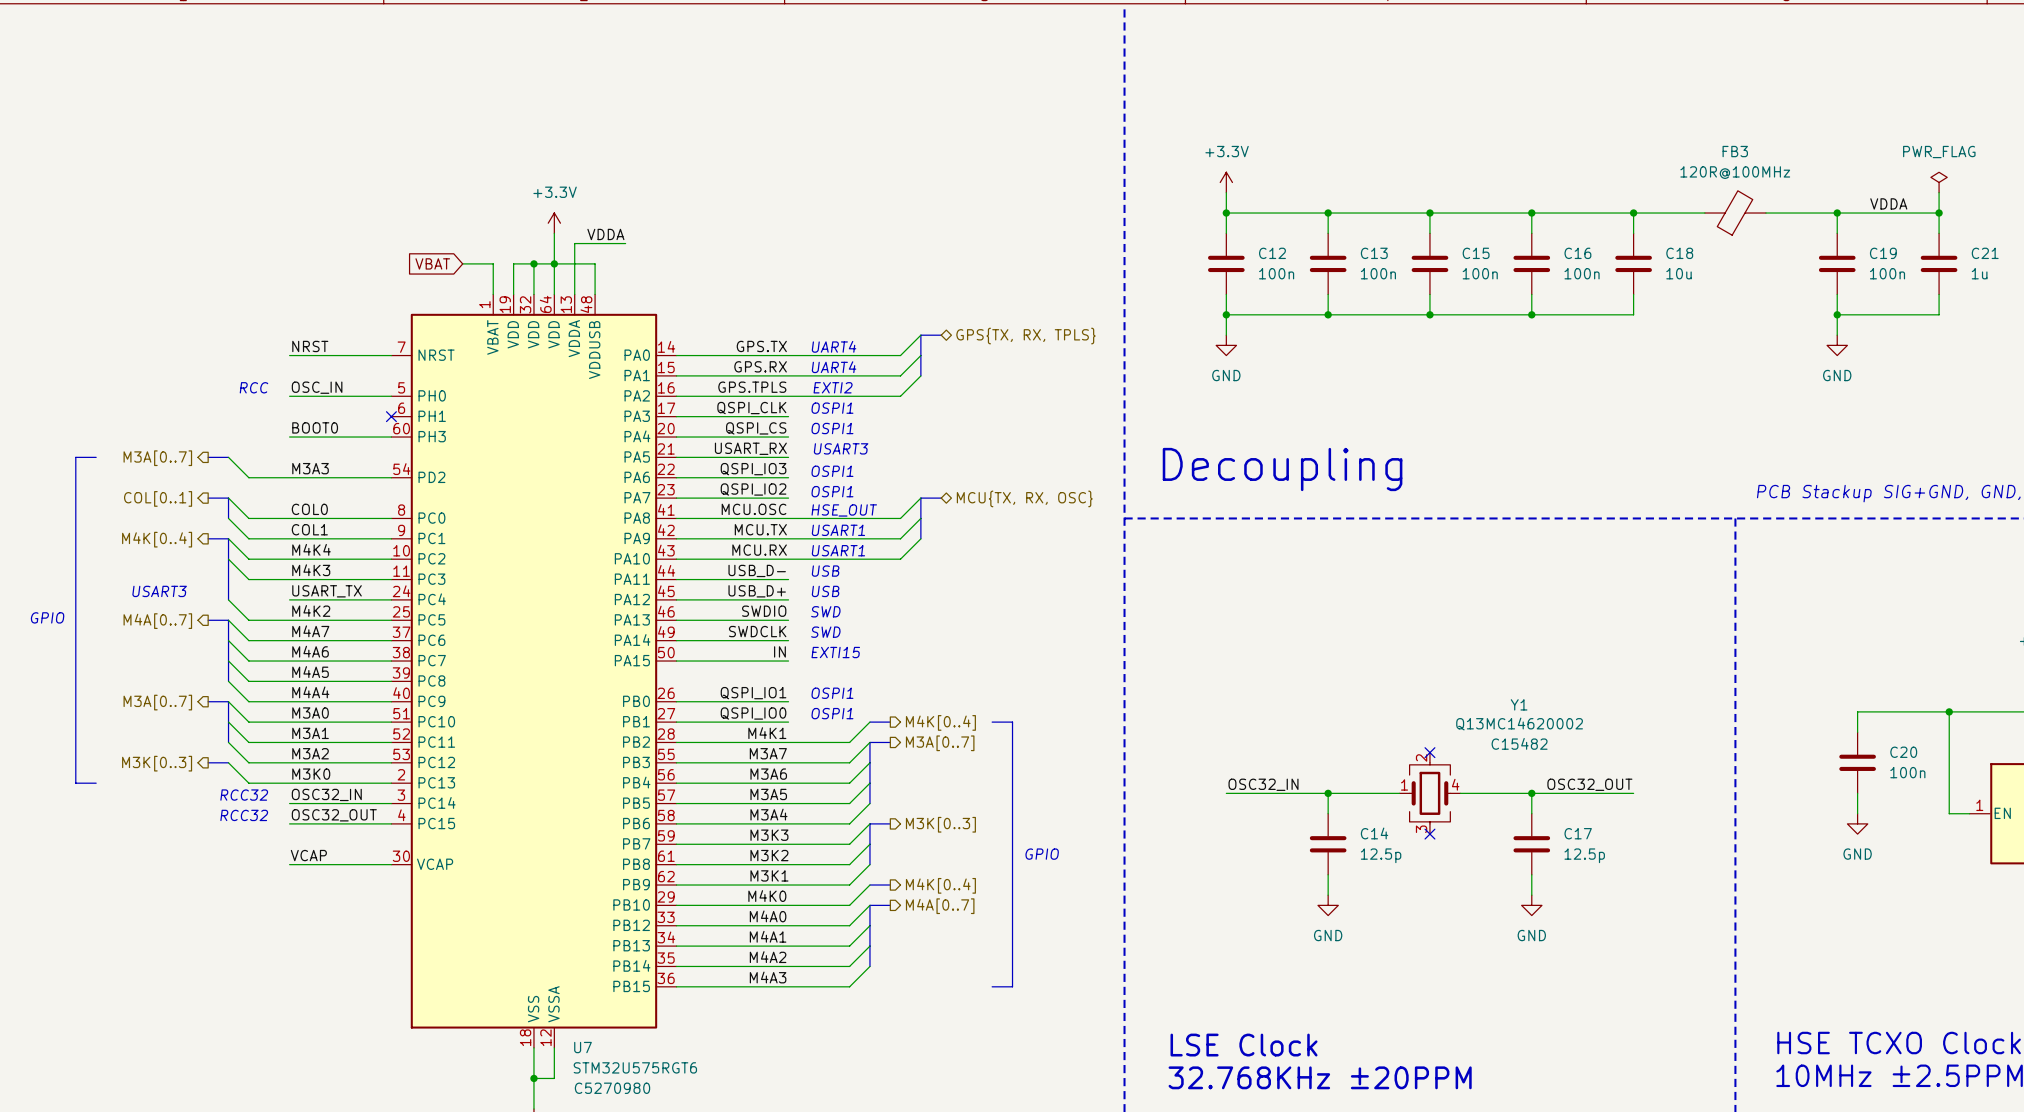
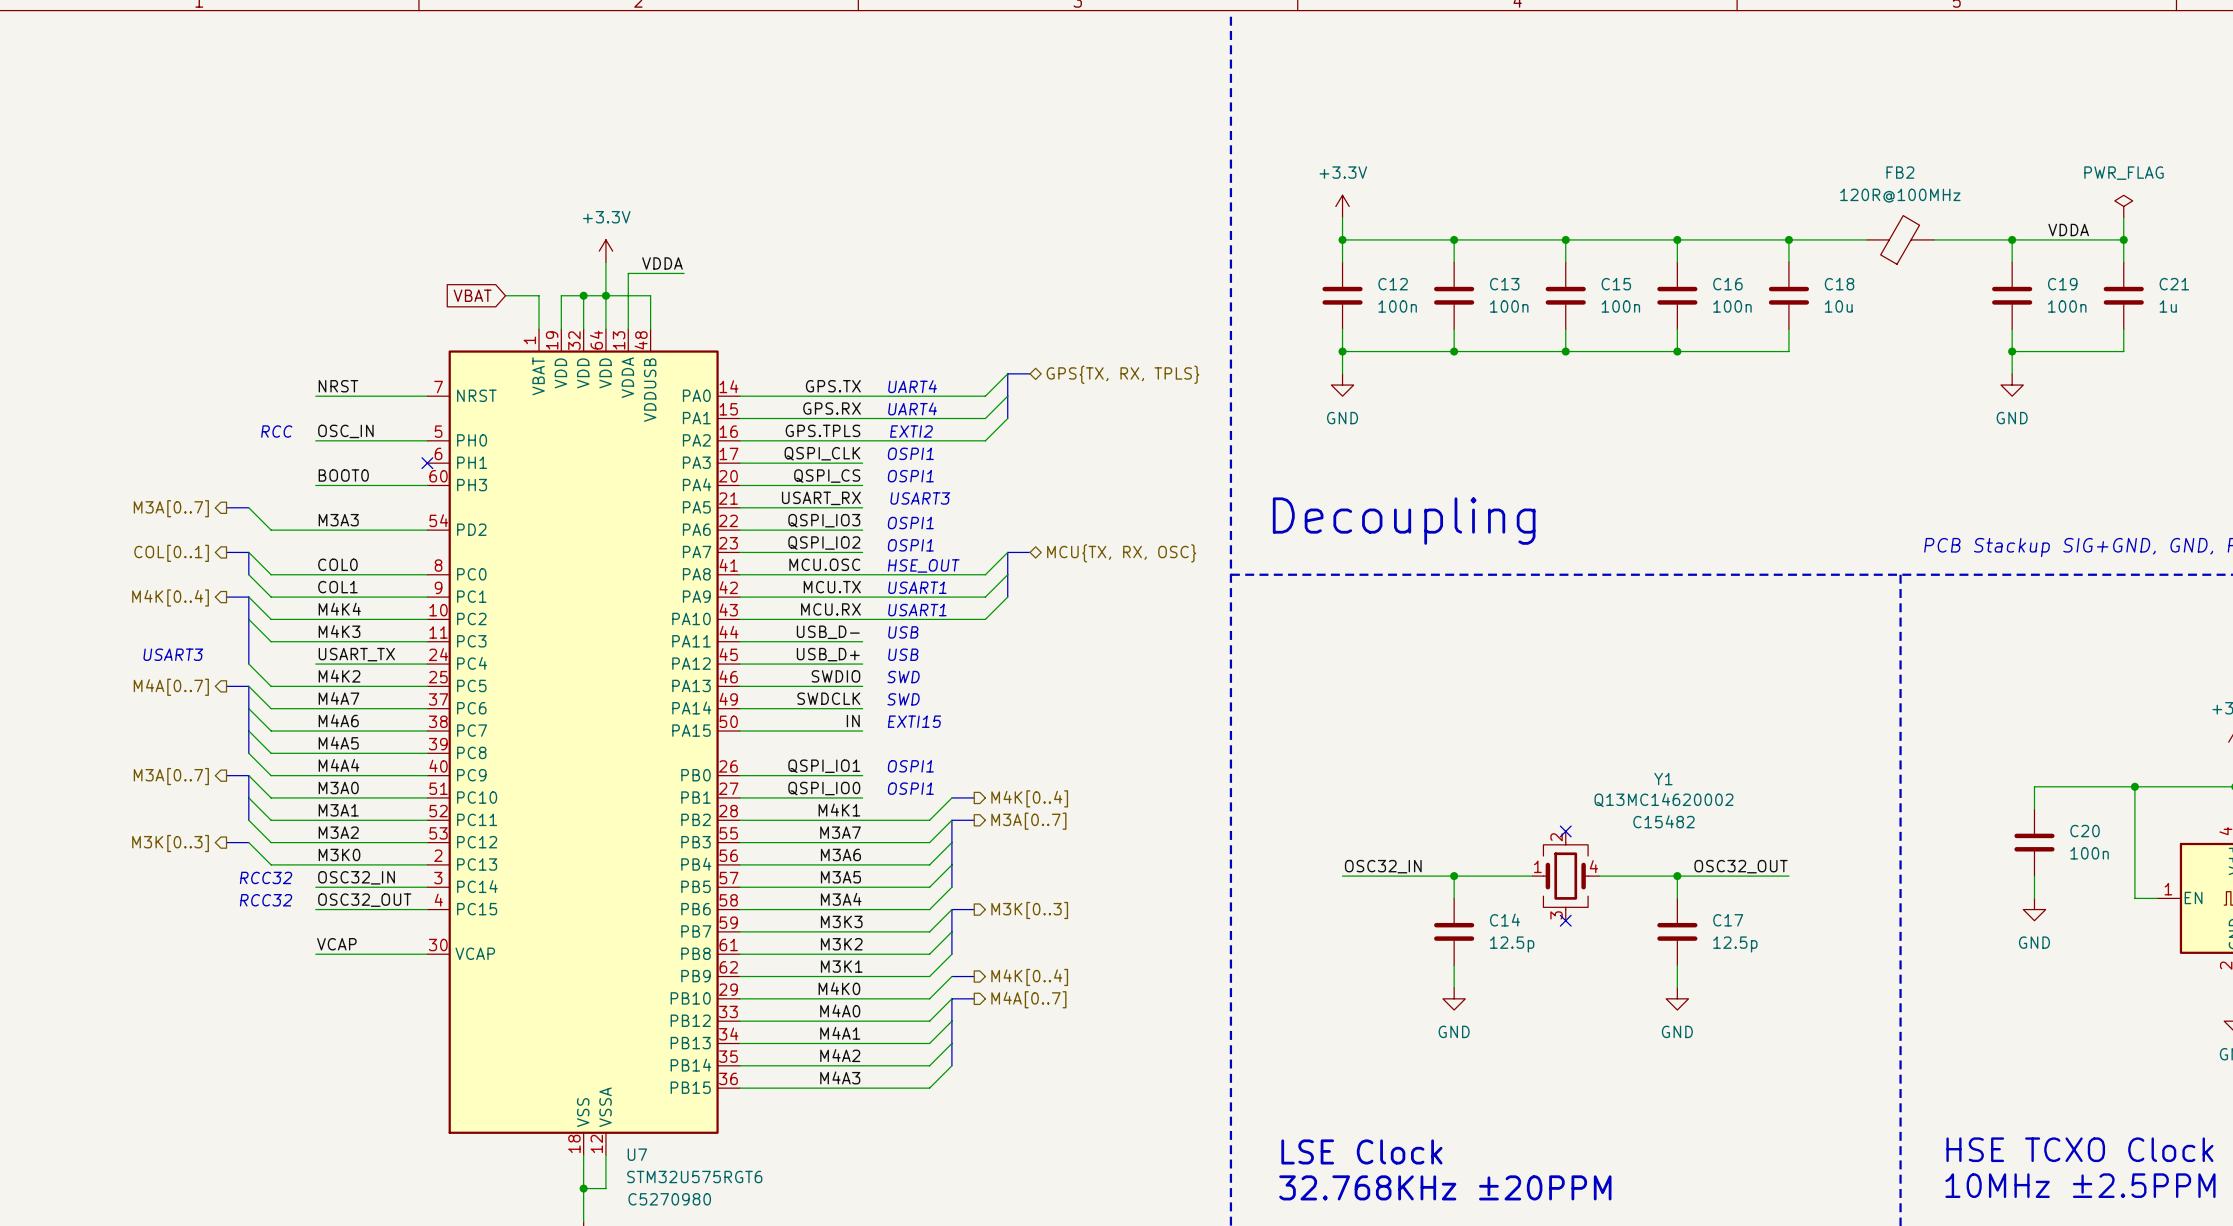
FB3 name: FB3 (1735, 151) -> FB2 (1900, 172)
line: (96, 457) (75, 457) (75, 783) (96, 783) -> none
text: GPIO (47, 617) -> none
line: (992, 722) (1012, 722) (1012, 986) (992, 986) -> none
text: GPIO (1042, 854) -> none

